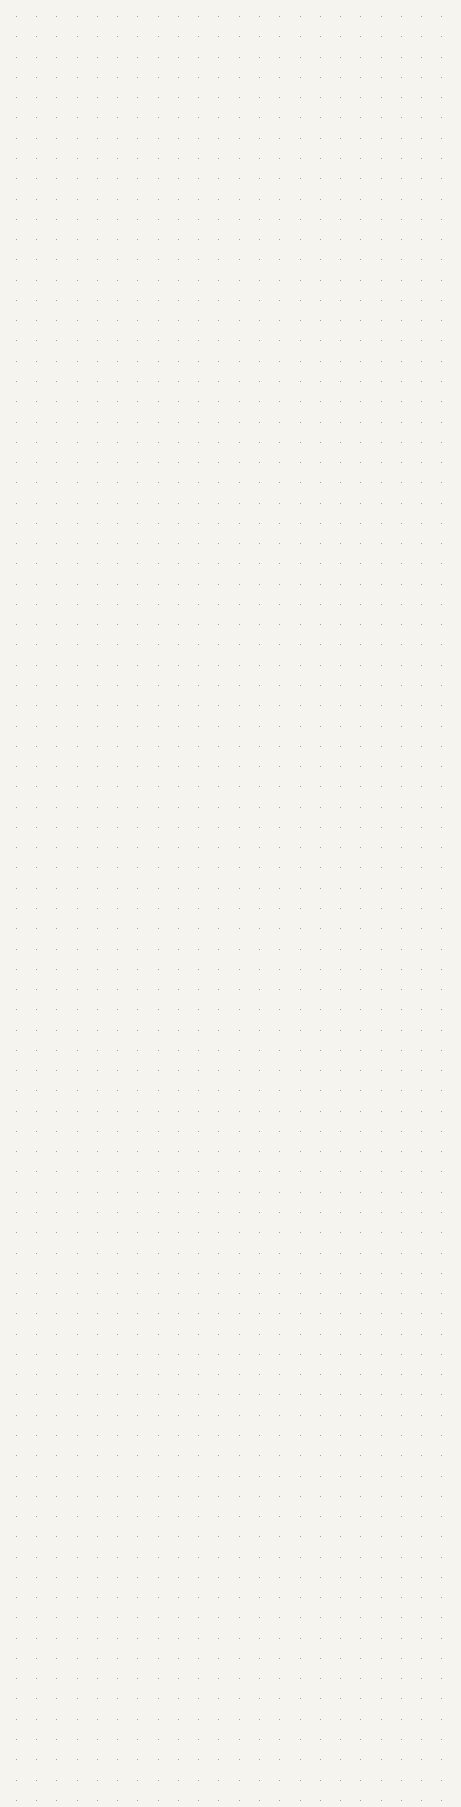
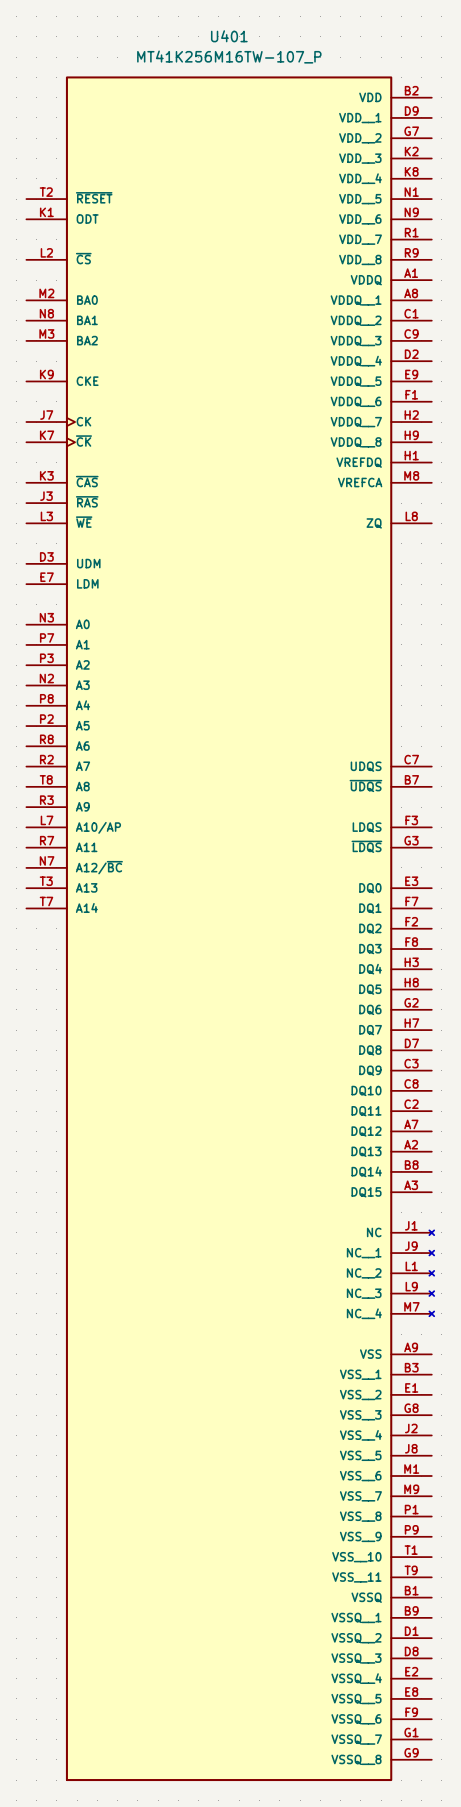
U401: none -> MT41K256M16TW-107_P (230, 928)

